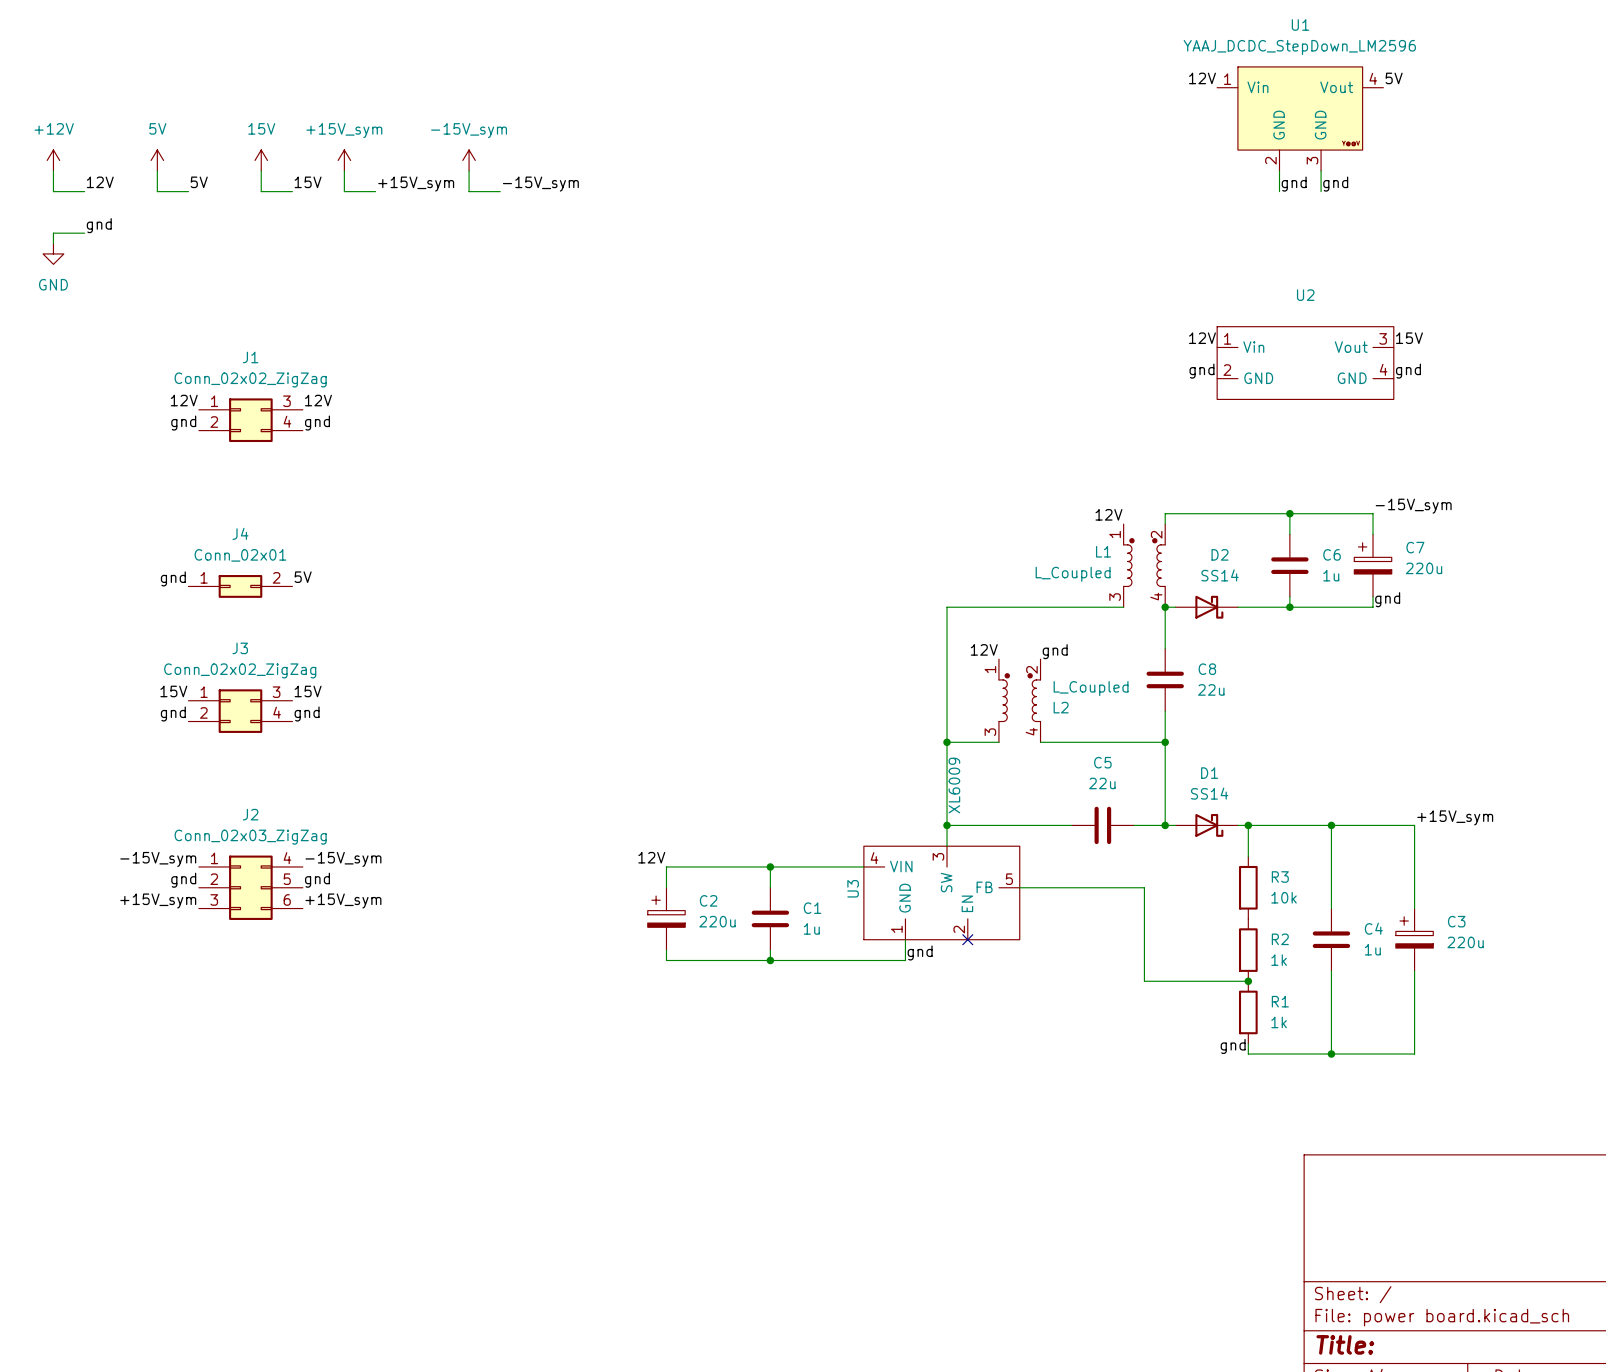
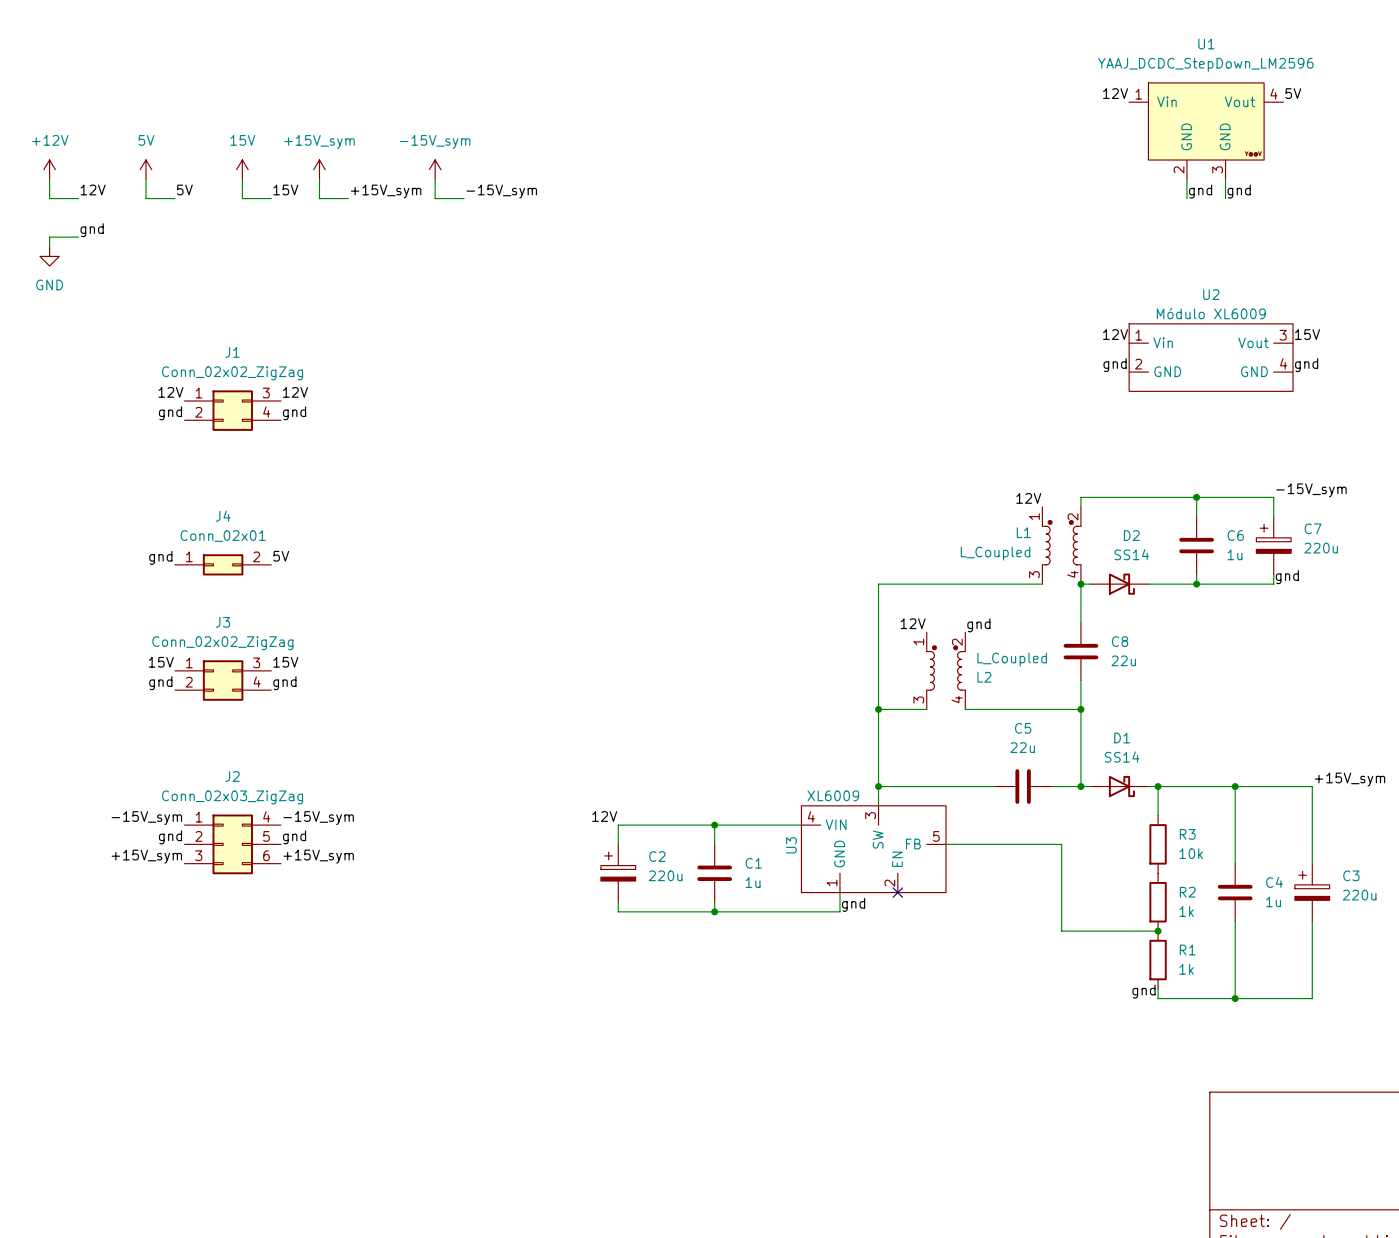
U2 value: none -> Módulo XL6009 (1211, 313)
U3 value rotation: 0° (954, 785) -> 90° clockwise (833, 795)
U3 value position: XL6009 (954, 785) -> XL6009 (833, 795)

